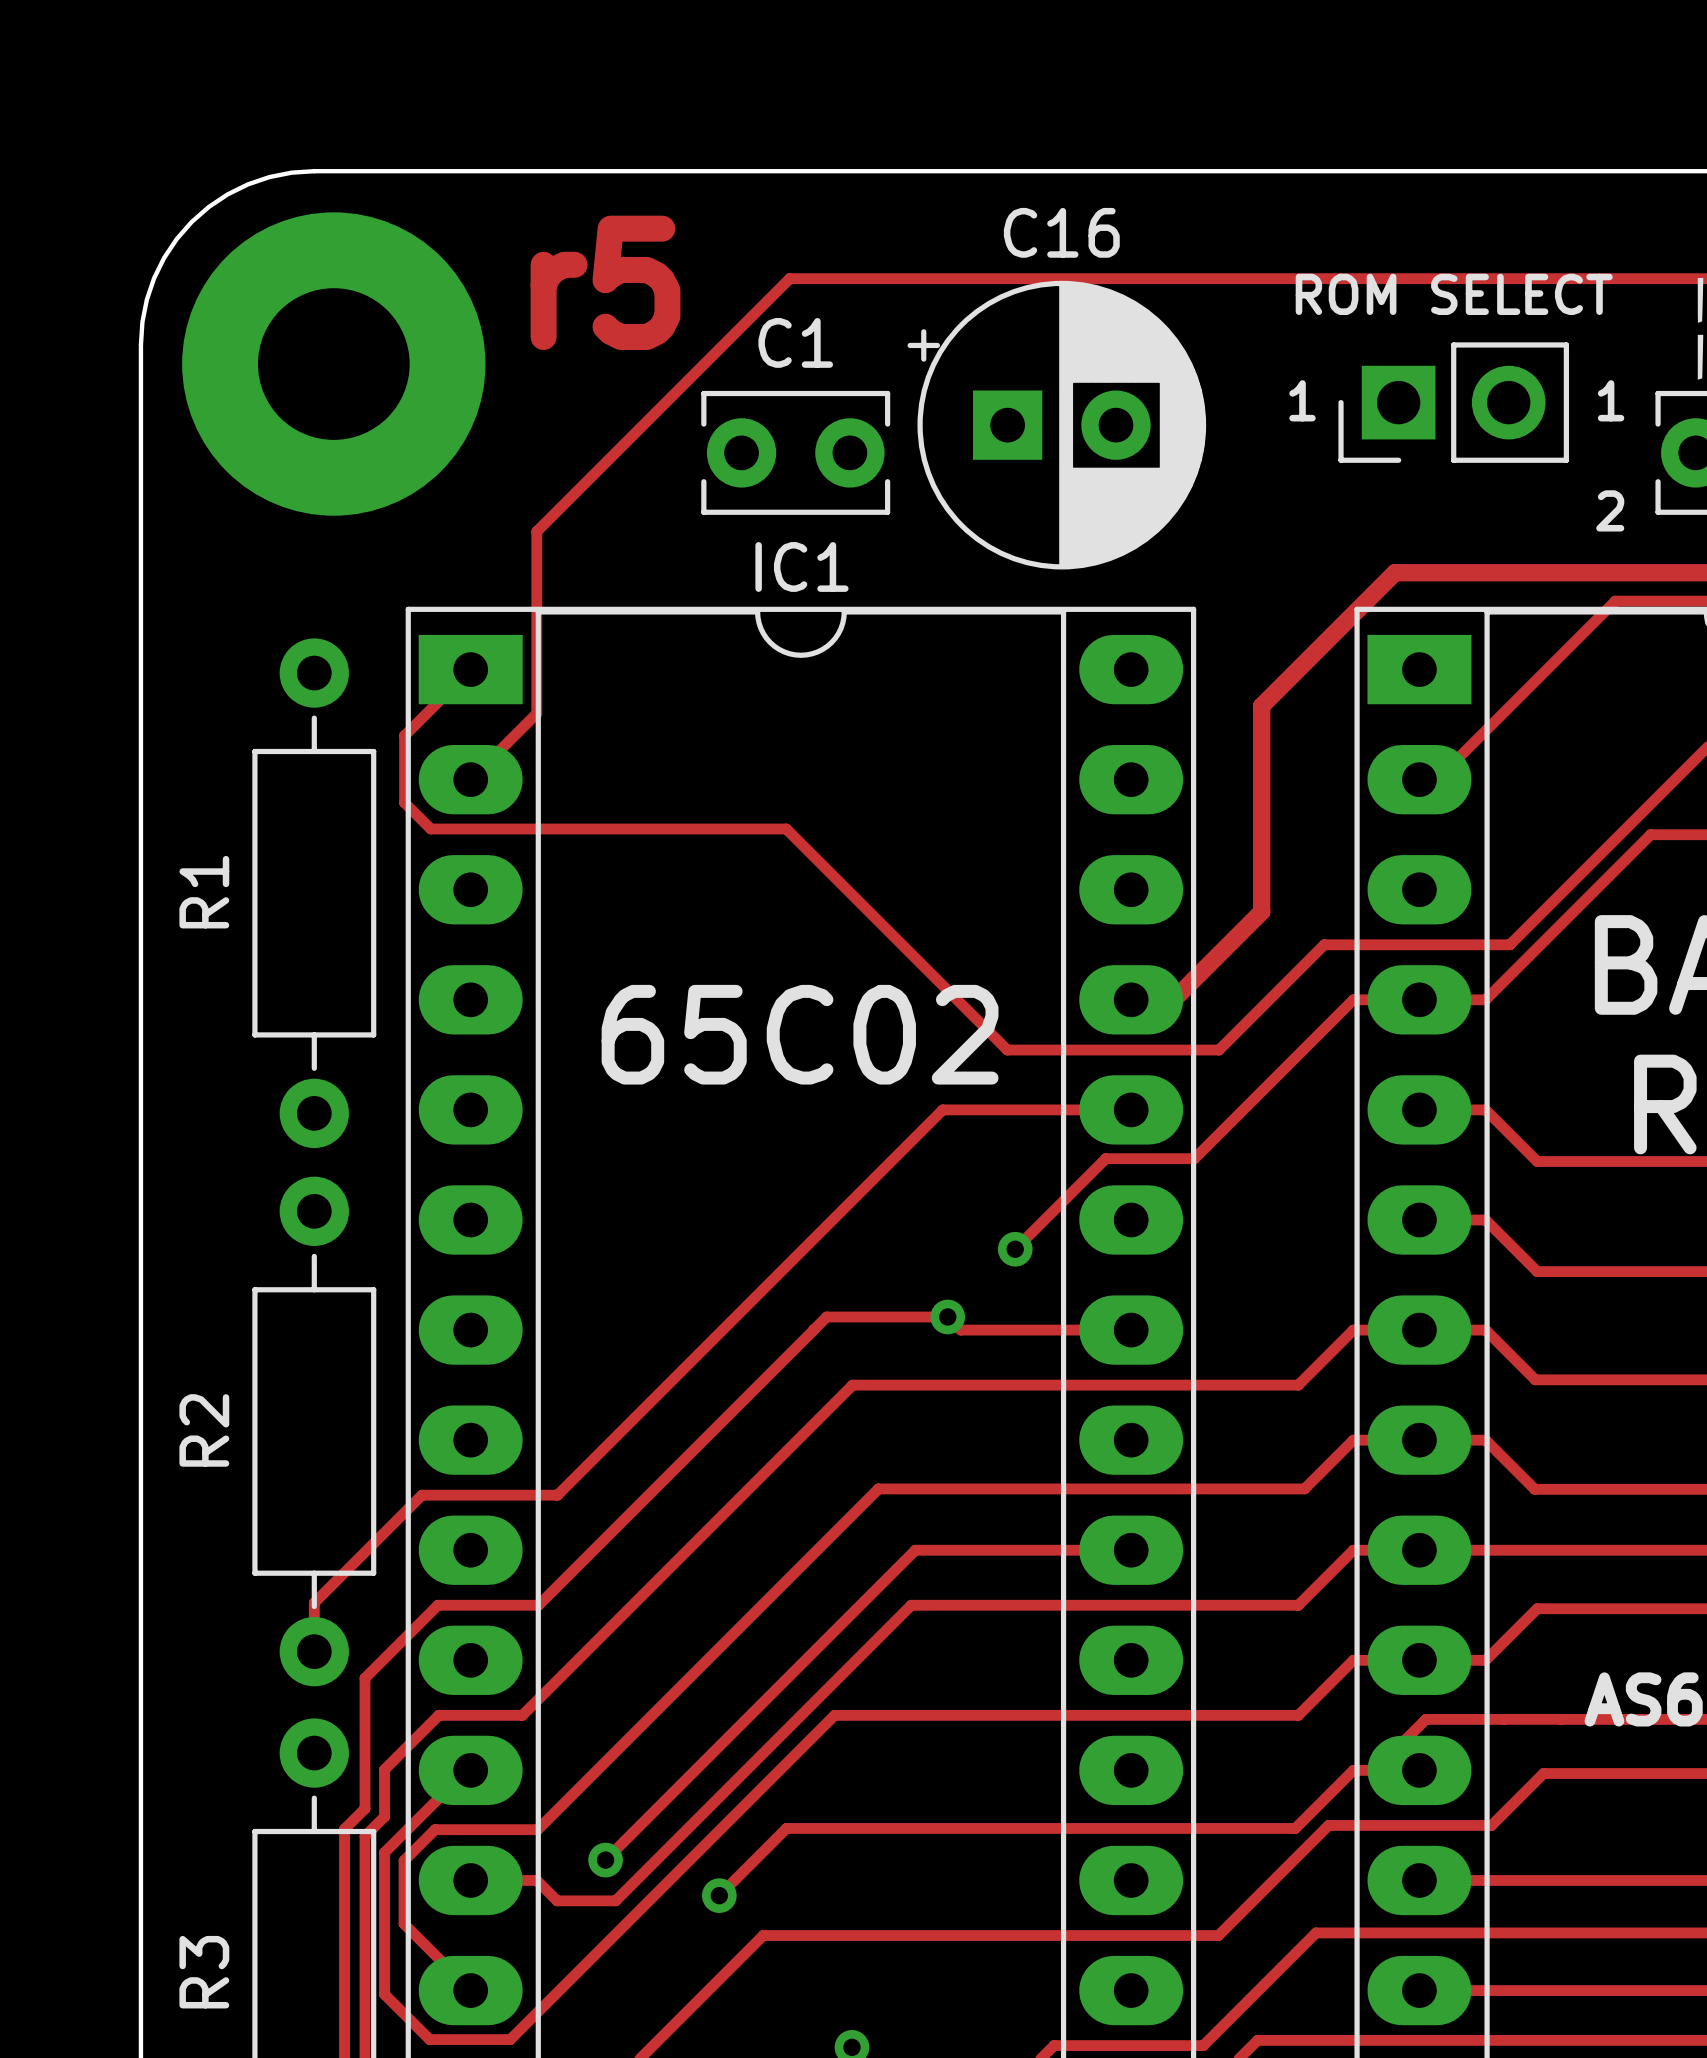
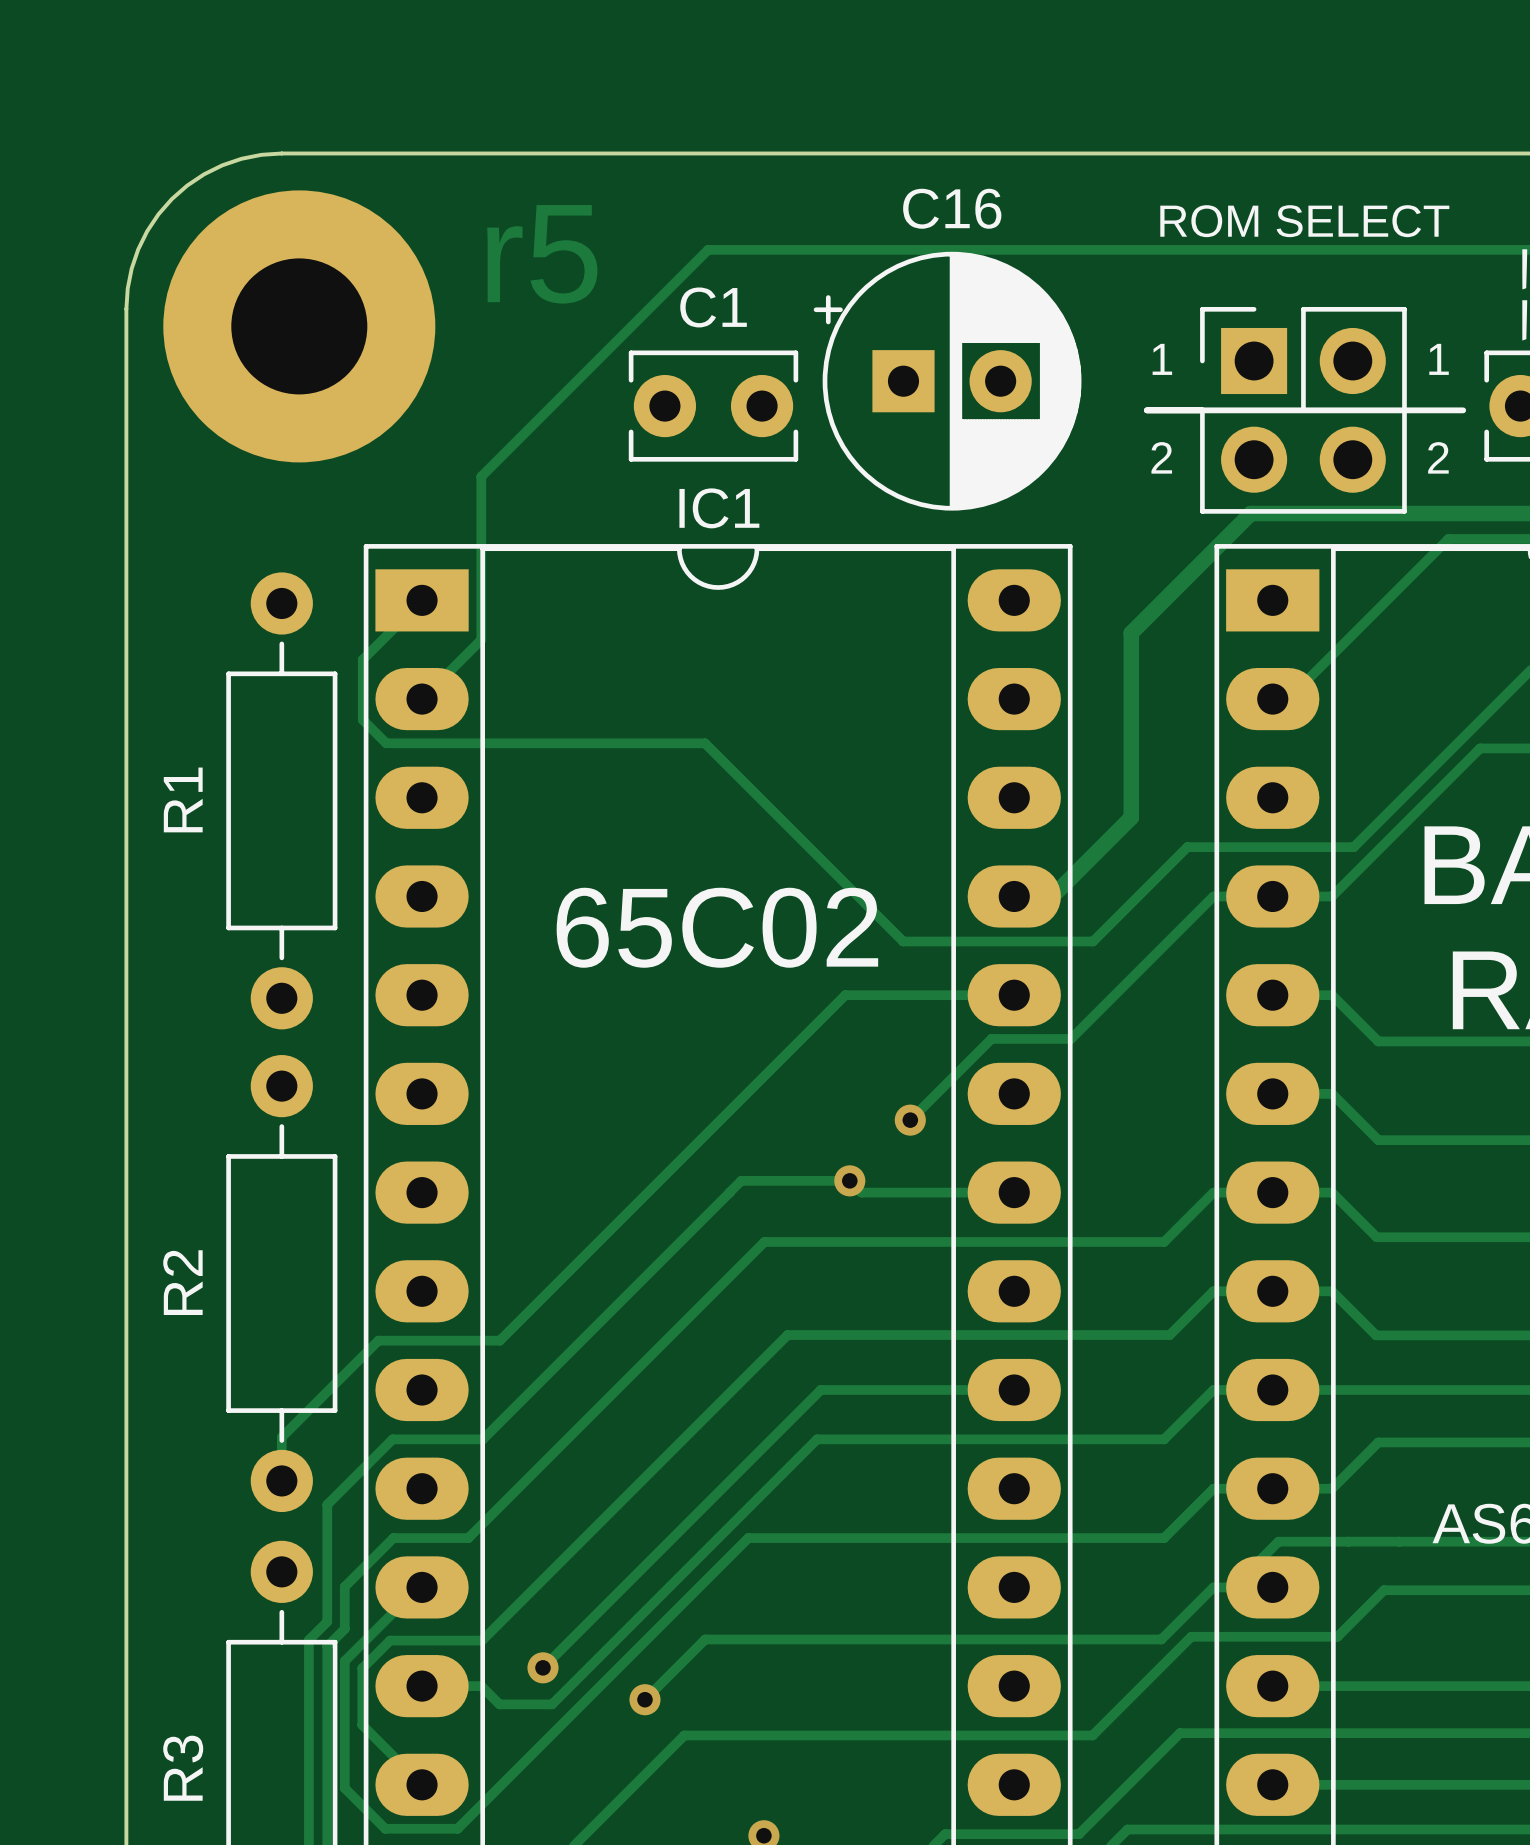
text position: ROM SELECT (1454, 294) -> ROM SELECT (1304, 221)
part: (1453, 402) -> none
line: none -> (1146, 410) (1463, 410)
part: none -> (1303, 410)
text: none -> 2 (1161, 457)

